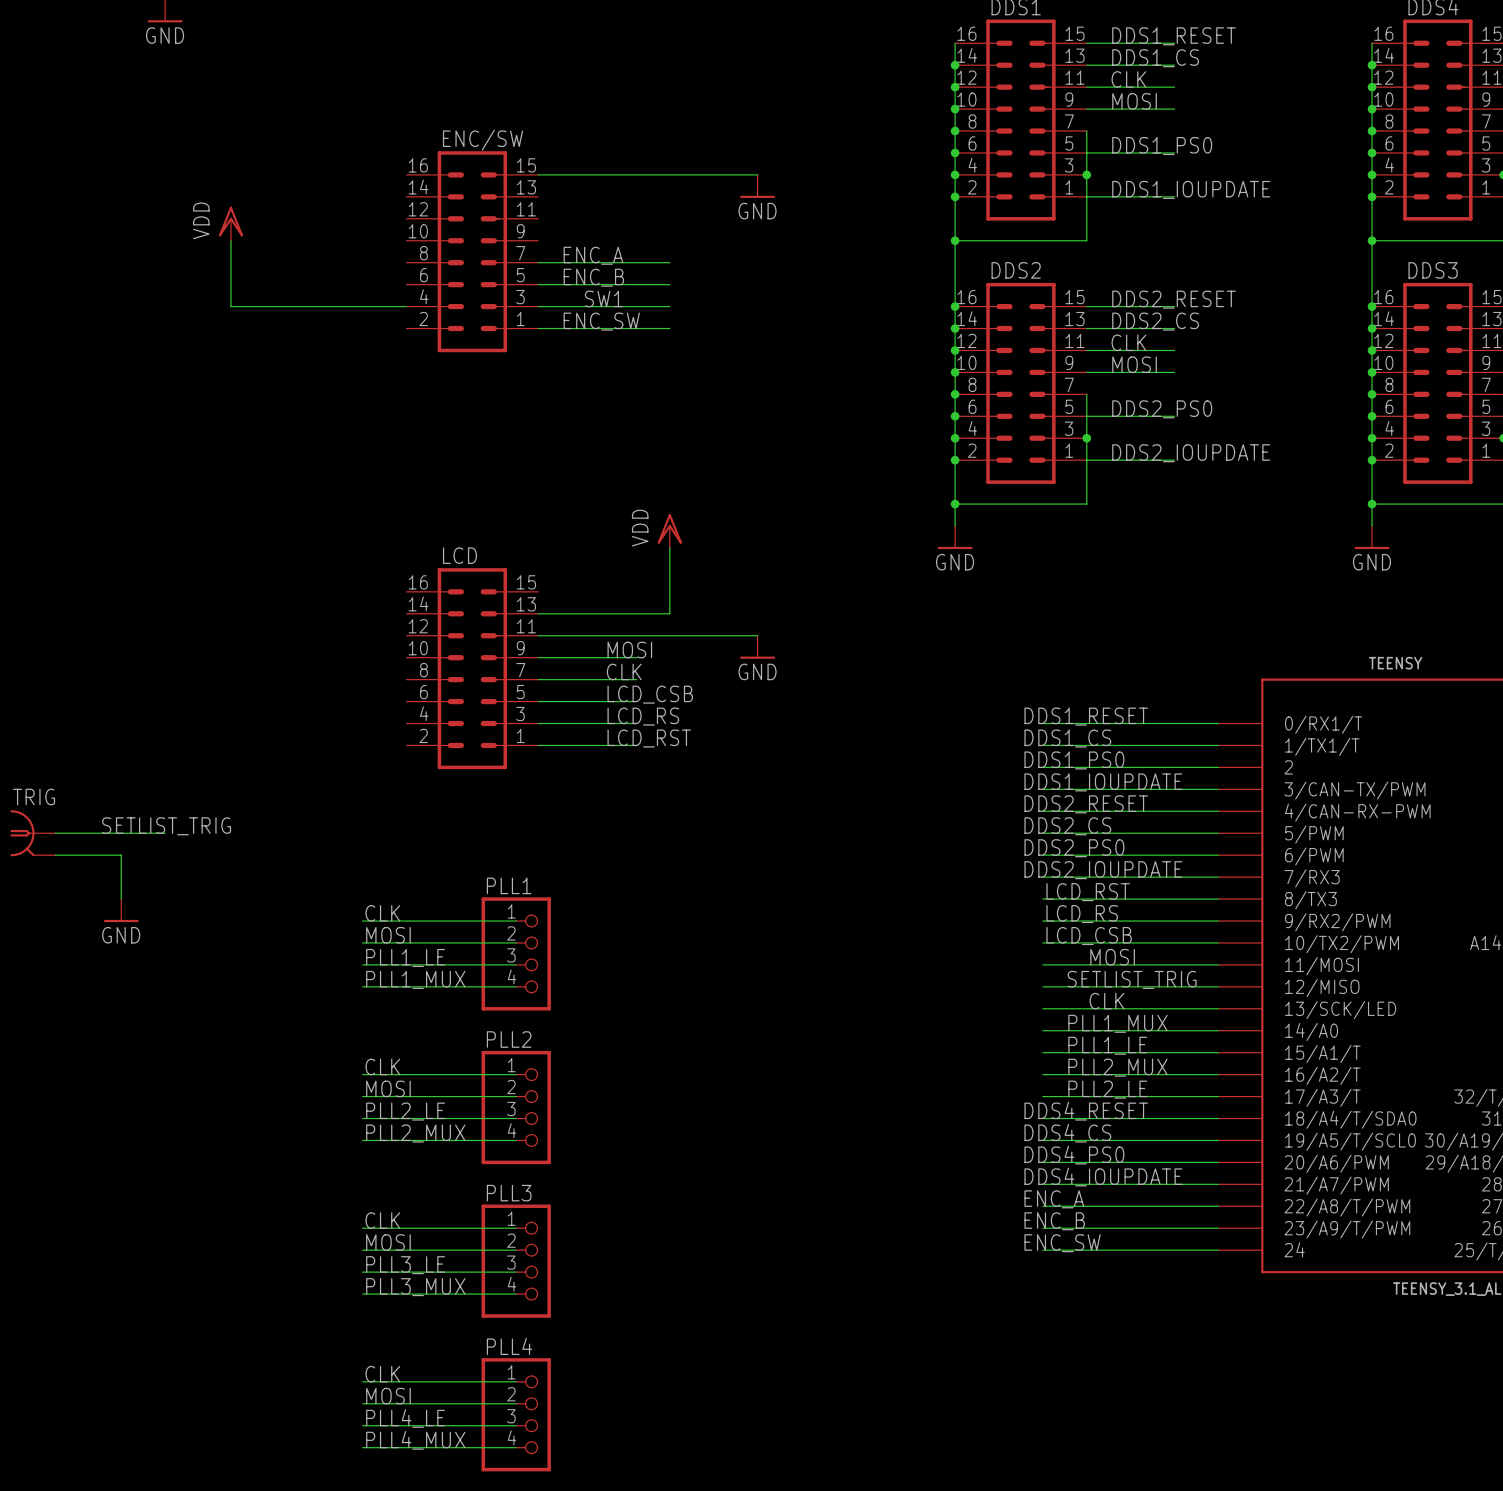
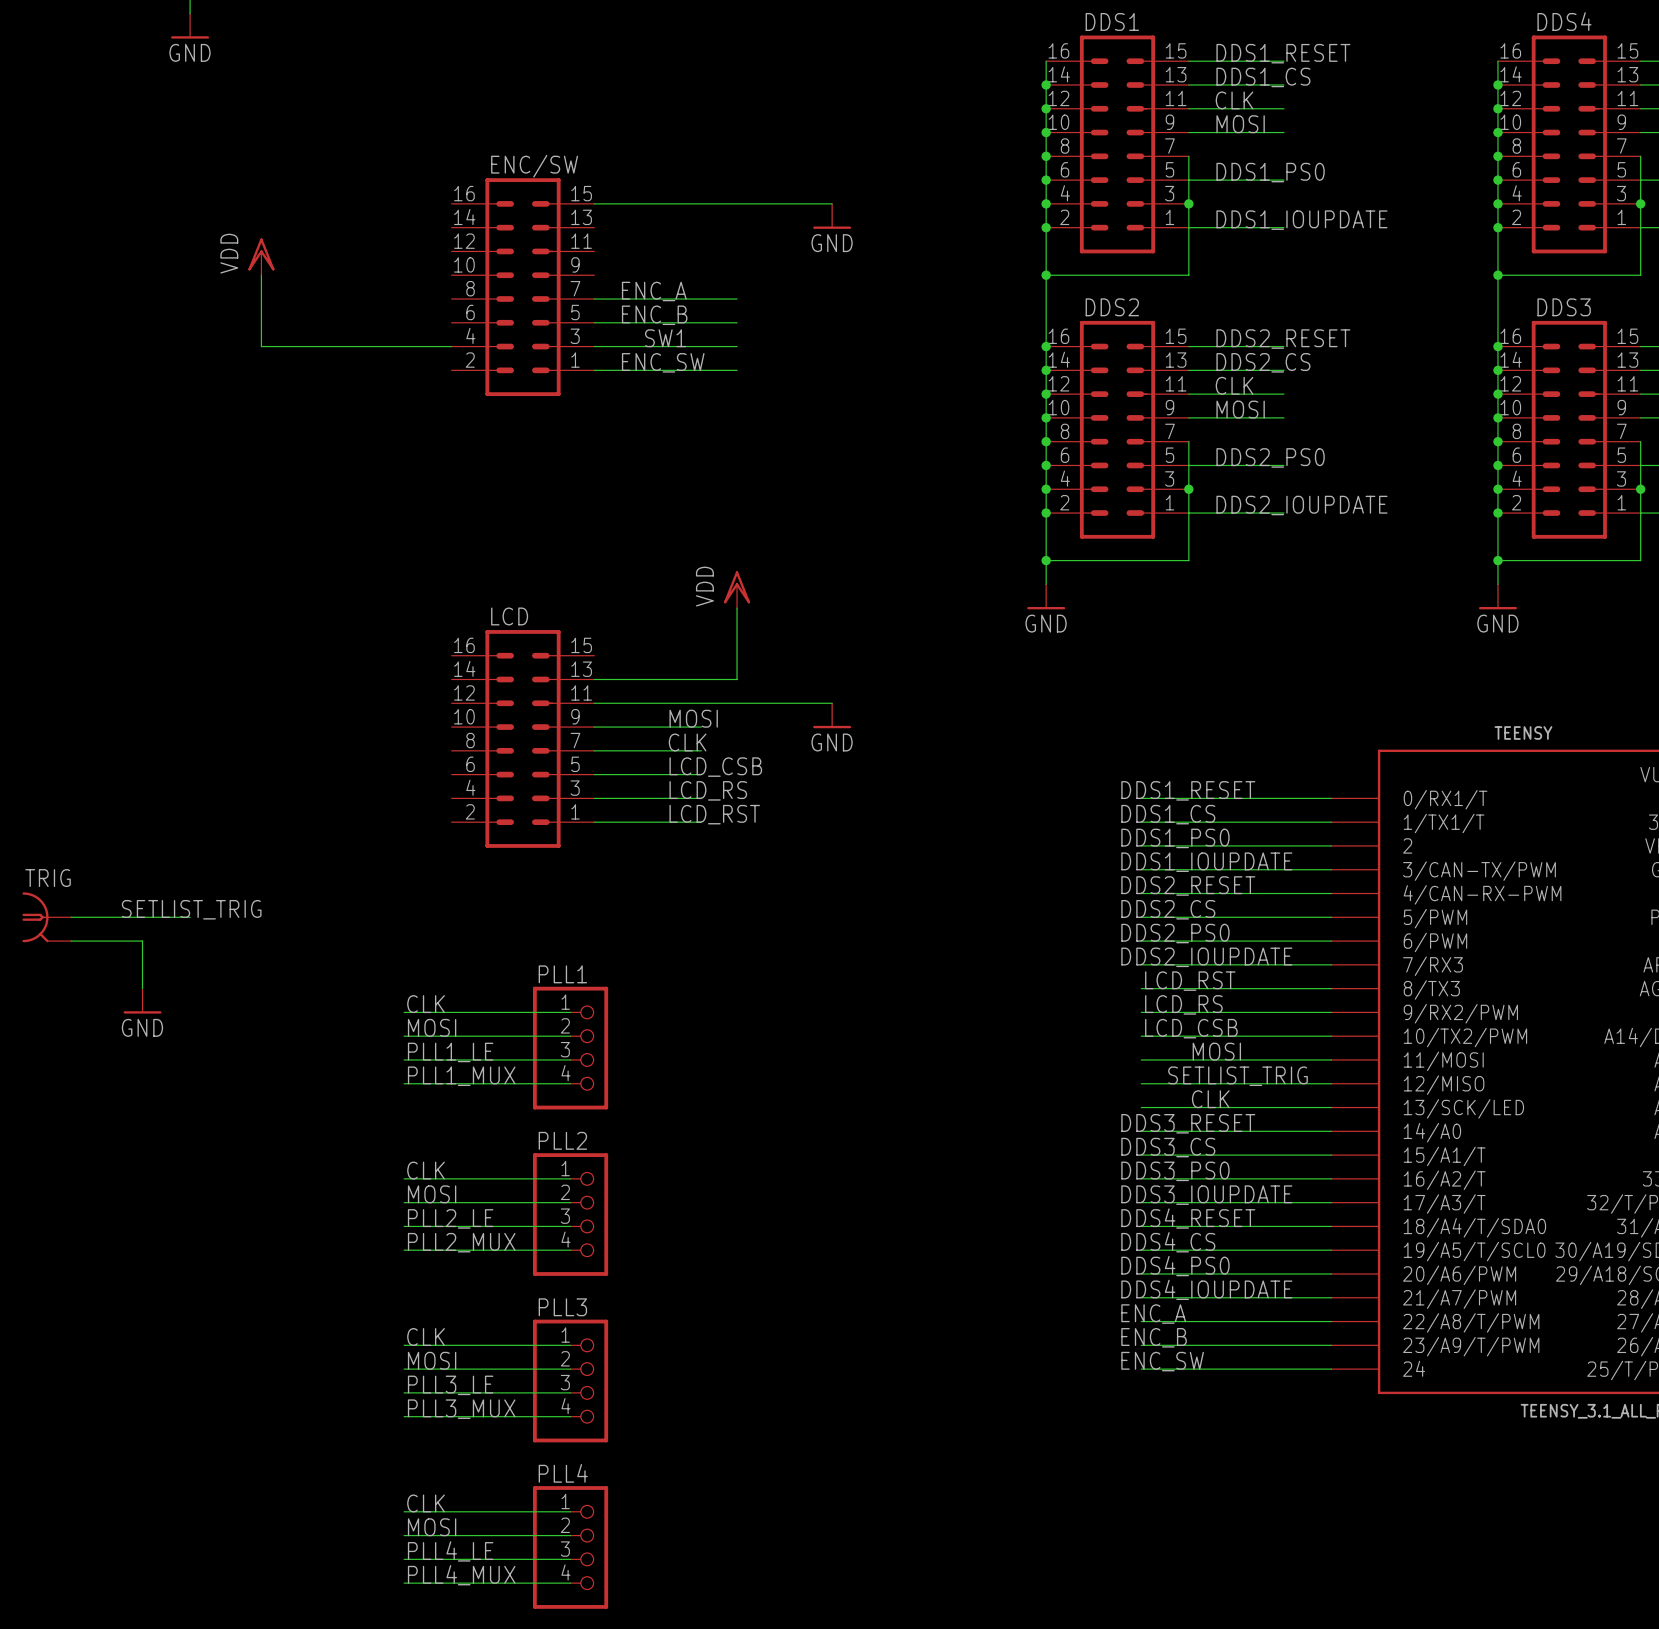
label: none -> DDS3_RESET (1188, 1123)
label: PLL1_MUX (1117, 1023) -> none
label: none -> DDS3_CS (1168, 1147)
label: PLL1_LE (1107, 1045) -> none
label: none -> DDS3_PS0 (1175, 1171)
label: PLL2_MUX (1117, 1067) -> none
label: none -> DDS3_IOUPDATE (1206, 1195)
label: PLL2_LE (1107, 1089) -> none

